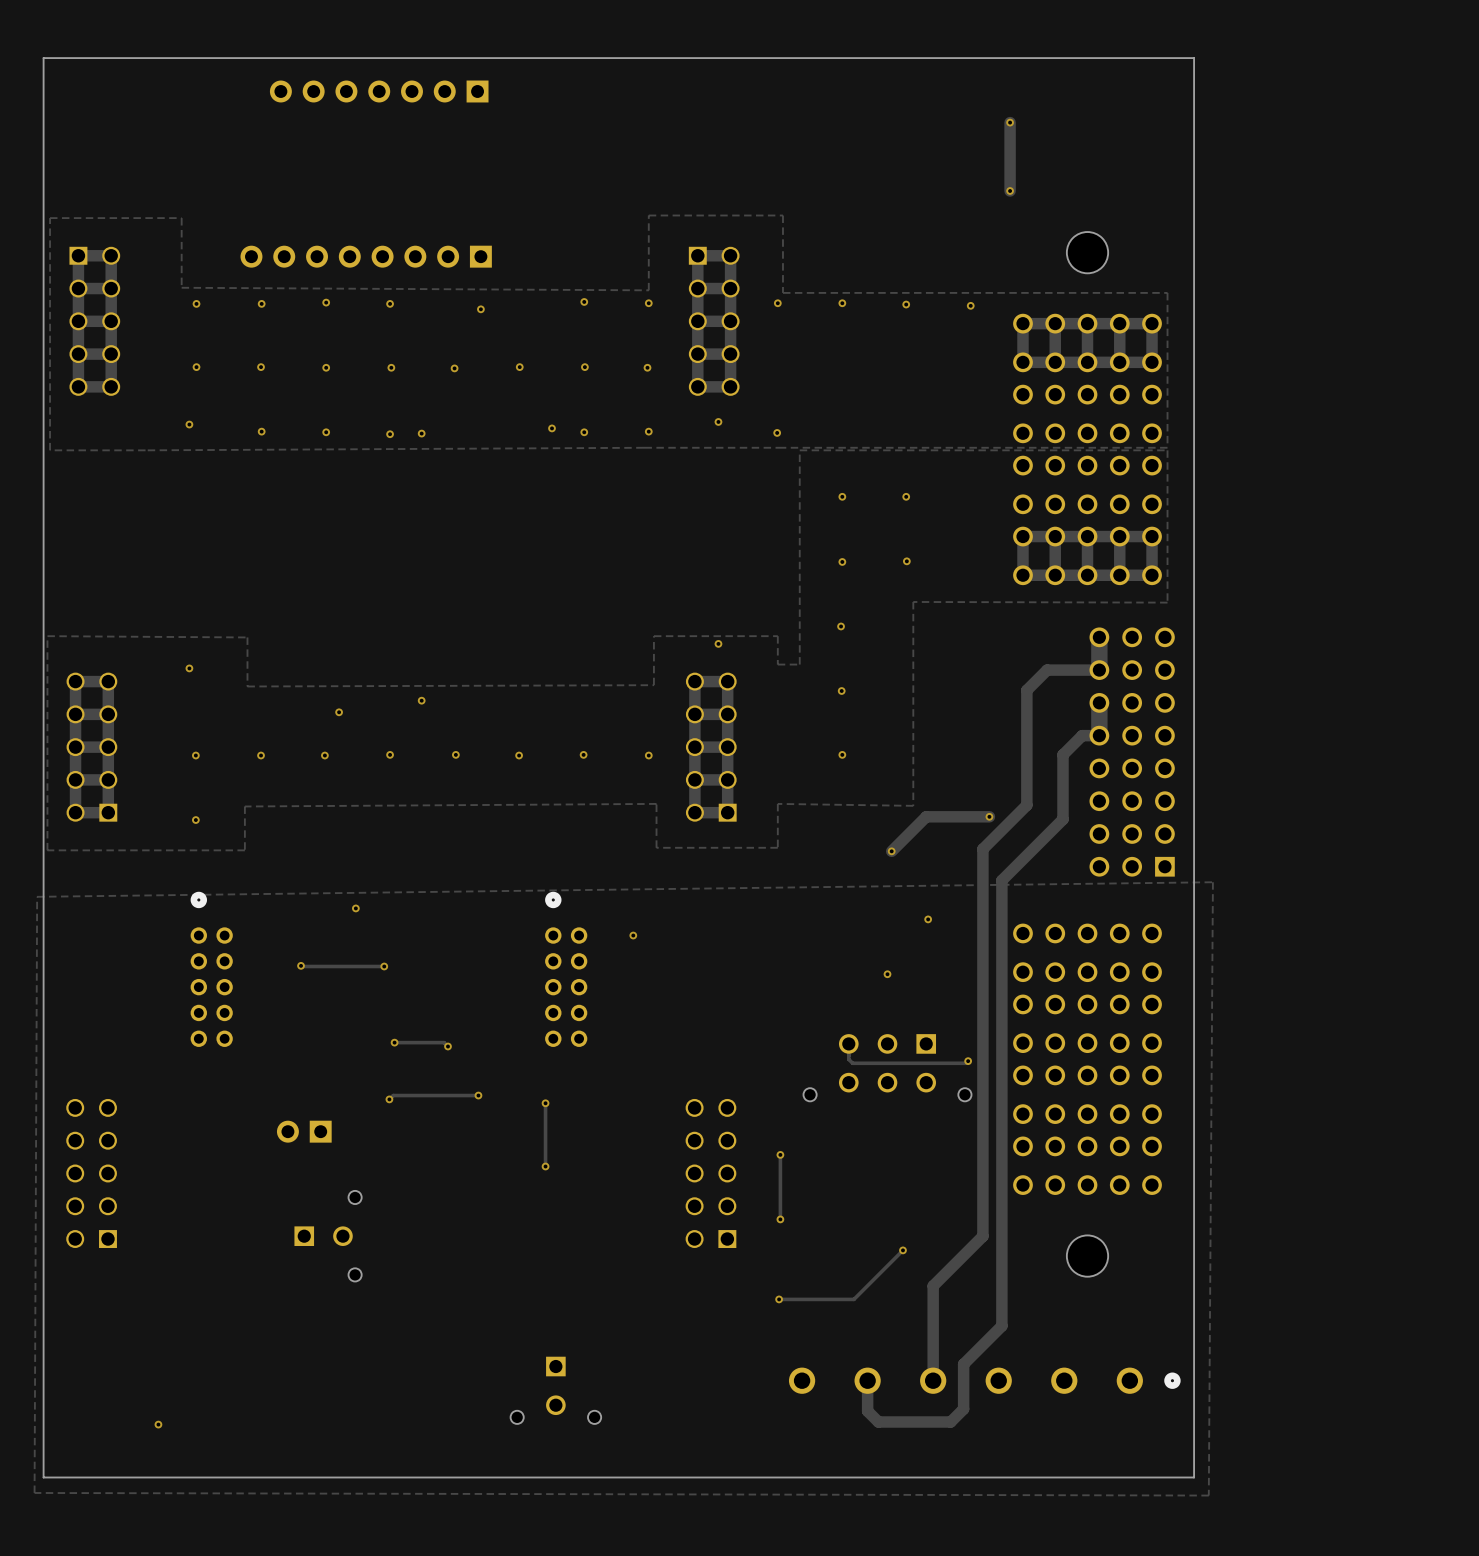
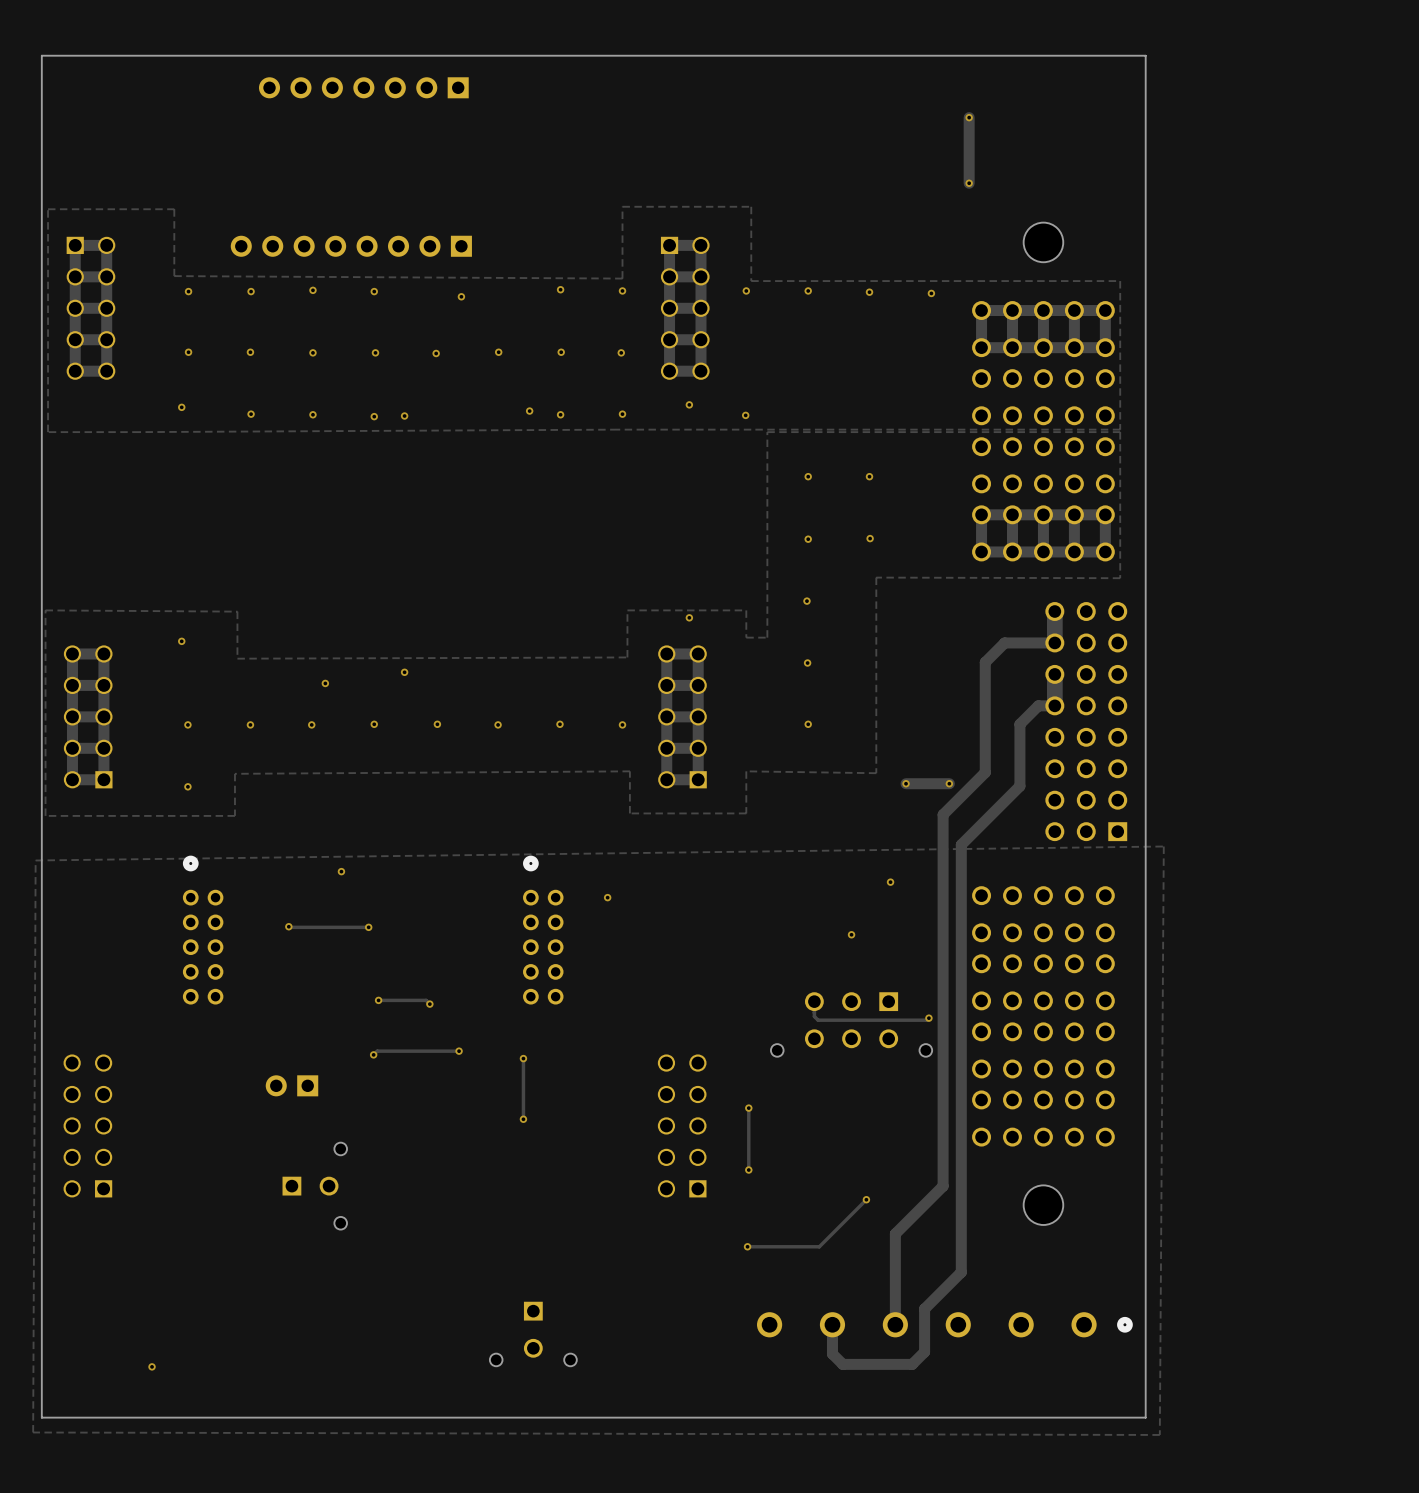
track: (944, 816) (926, 816) (891, 851) -> none
via position: (891, 851) -> (906, 783)

